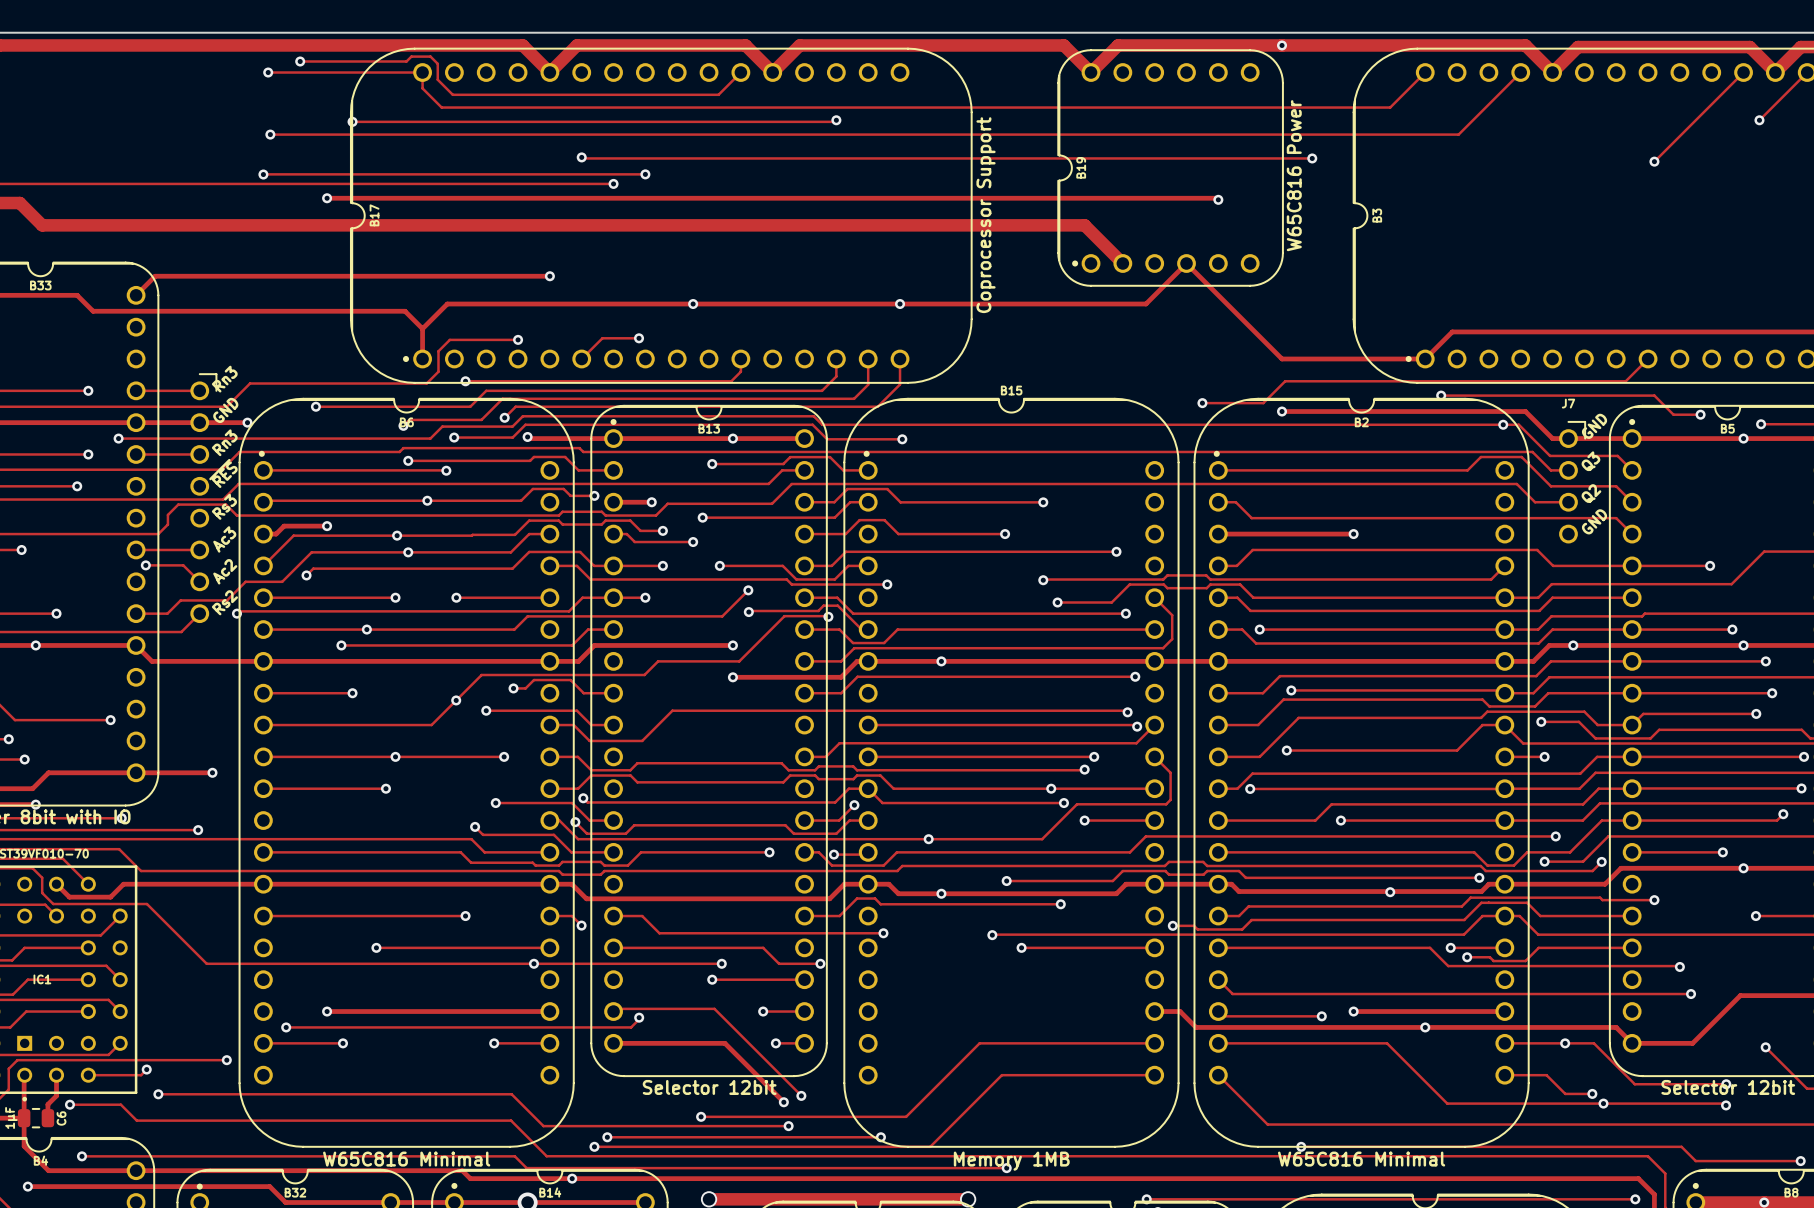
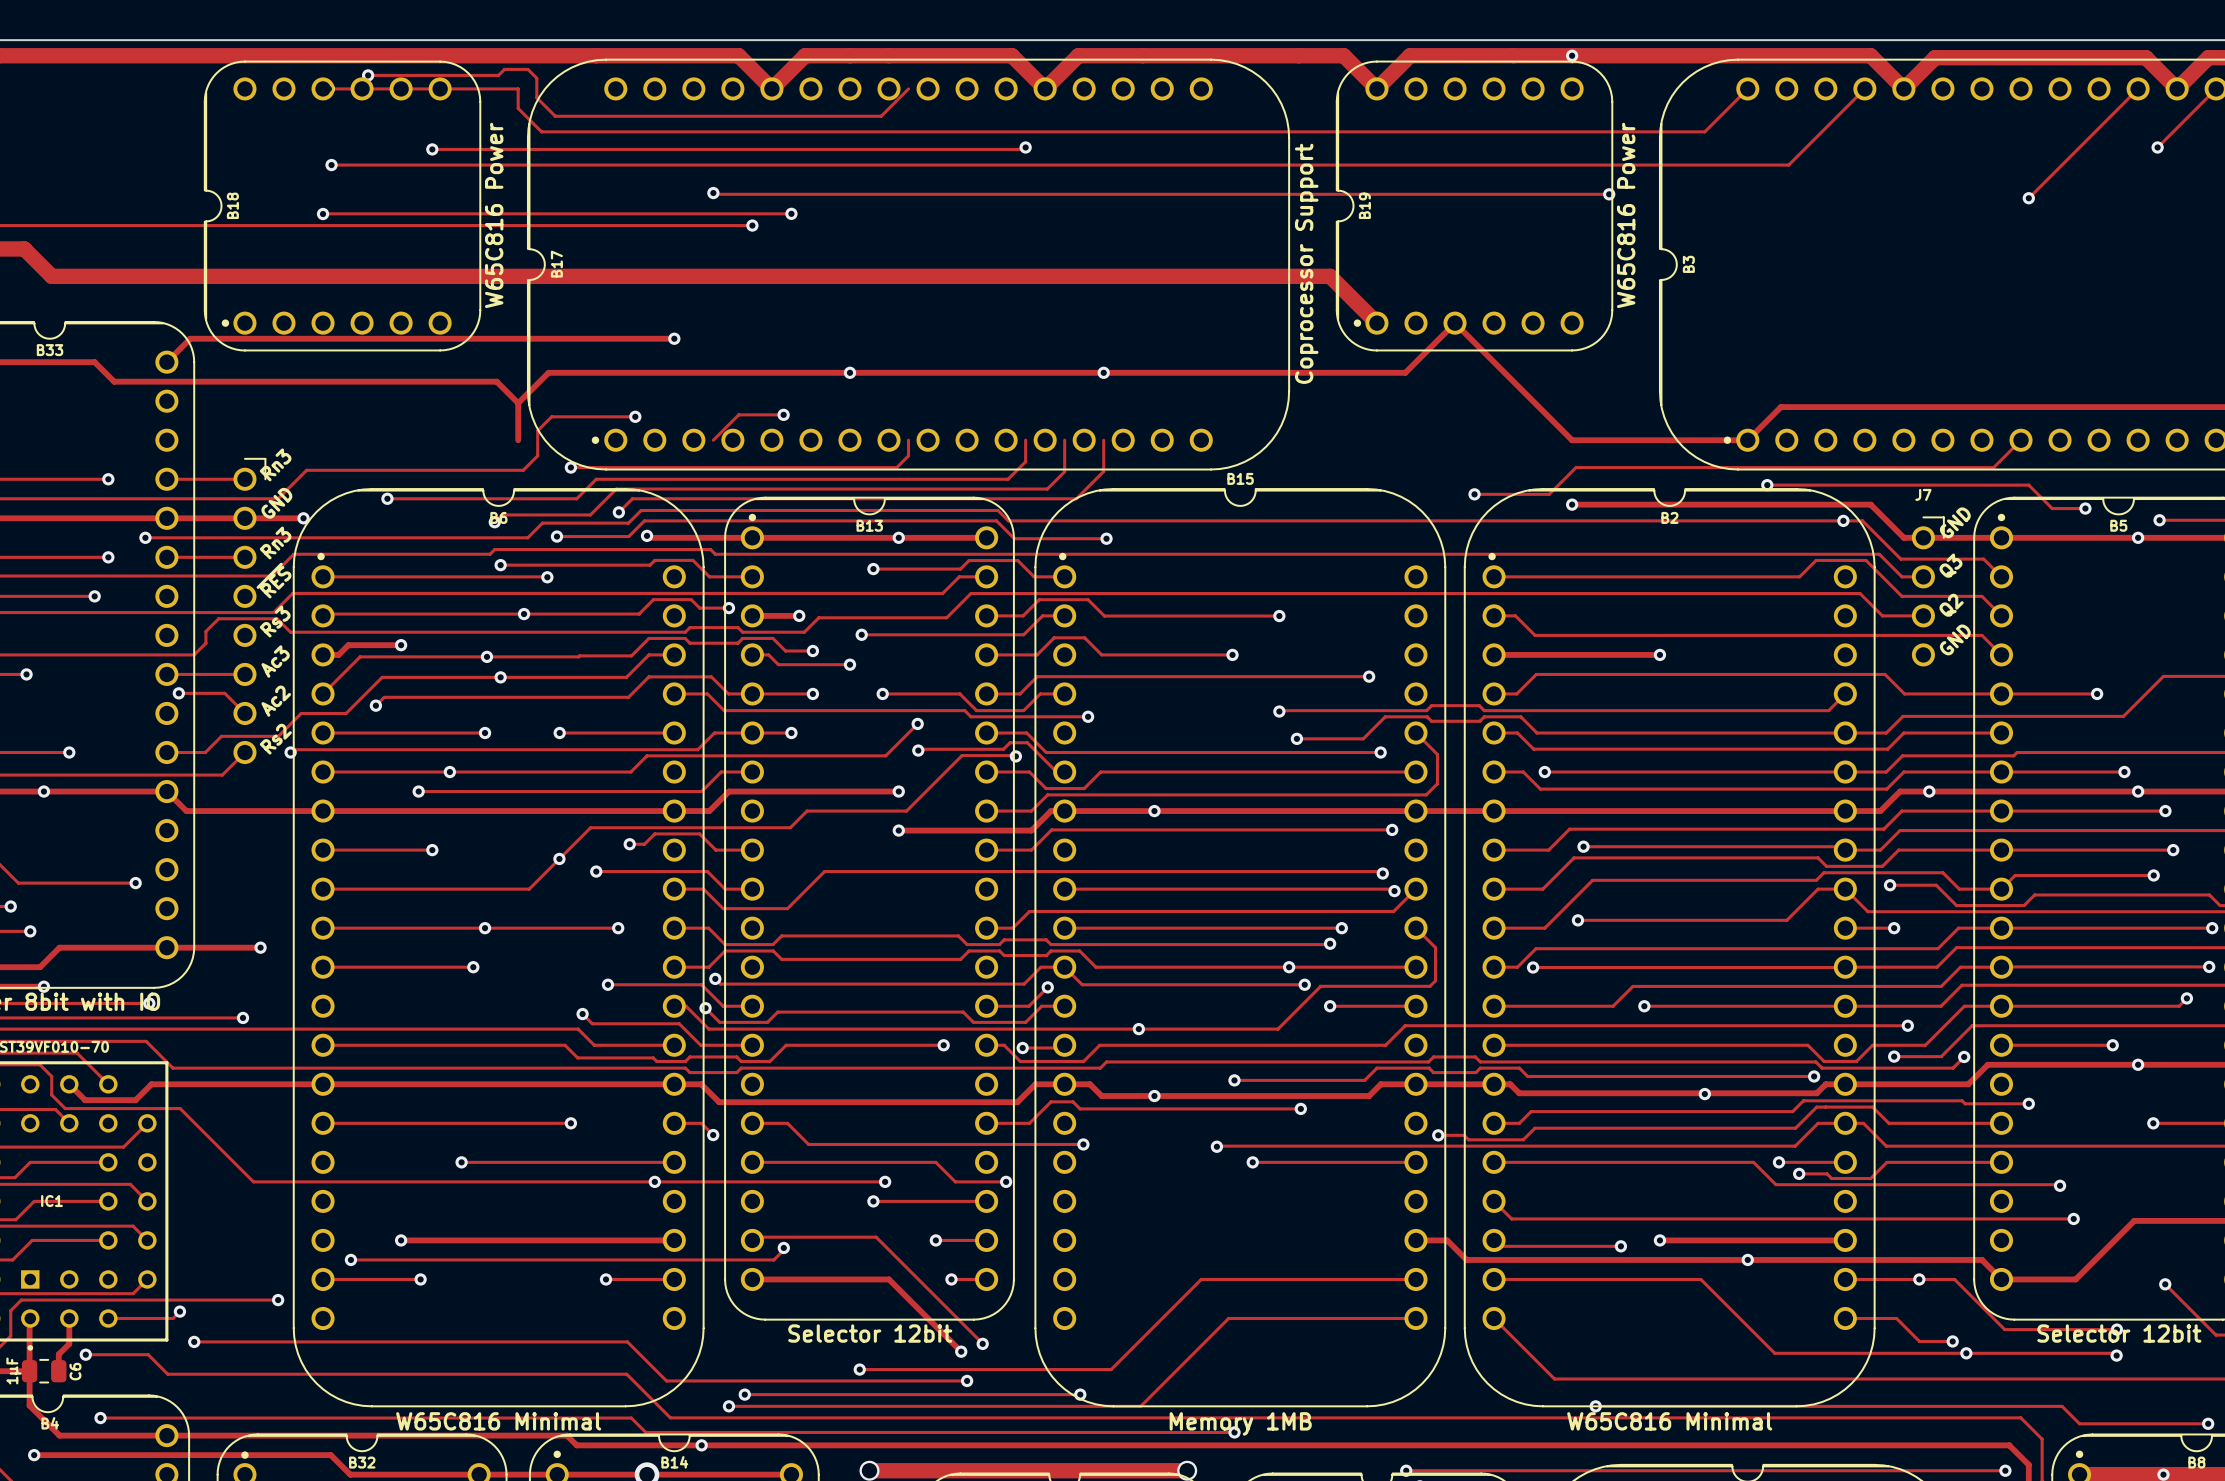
track: (522, 45) (549, 72) (576, 45) -> (641, 55) (707, 55)
track: (602, 45) (656, 45) -> (738, 55) (771, 88) (805, 55)
track: (745, 45) (772, 72) (799, 45) -> (914, 55) (980, 55)
track: (825, 45) (879, 45) -> (1011, 55) (1045, 88) (1078, 55)
track: (1063, 45) (1091, 72) (1118, 45) (1149, 45) -> (1304, 55) (1343, 55) (1376, 88) (1410, 55)
B18: none -> (342, 206)
B19 position: (1170, 168) -> (1474, 206)
track: (327, 198) (1216, 198) (1218, 199) -> none
via: (327, 198) -> none
via: (1218, 199) -> none
B17 position: (661, 215) -> (908, 264)

